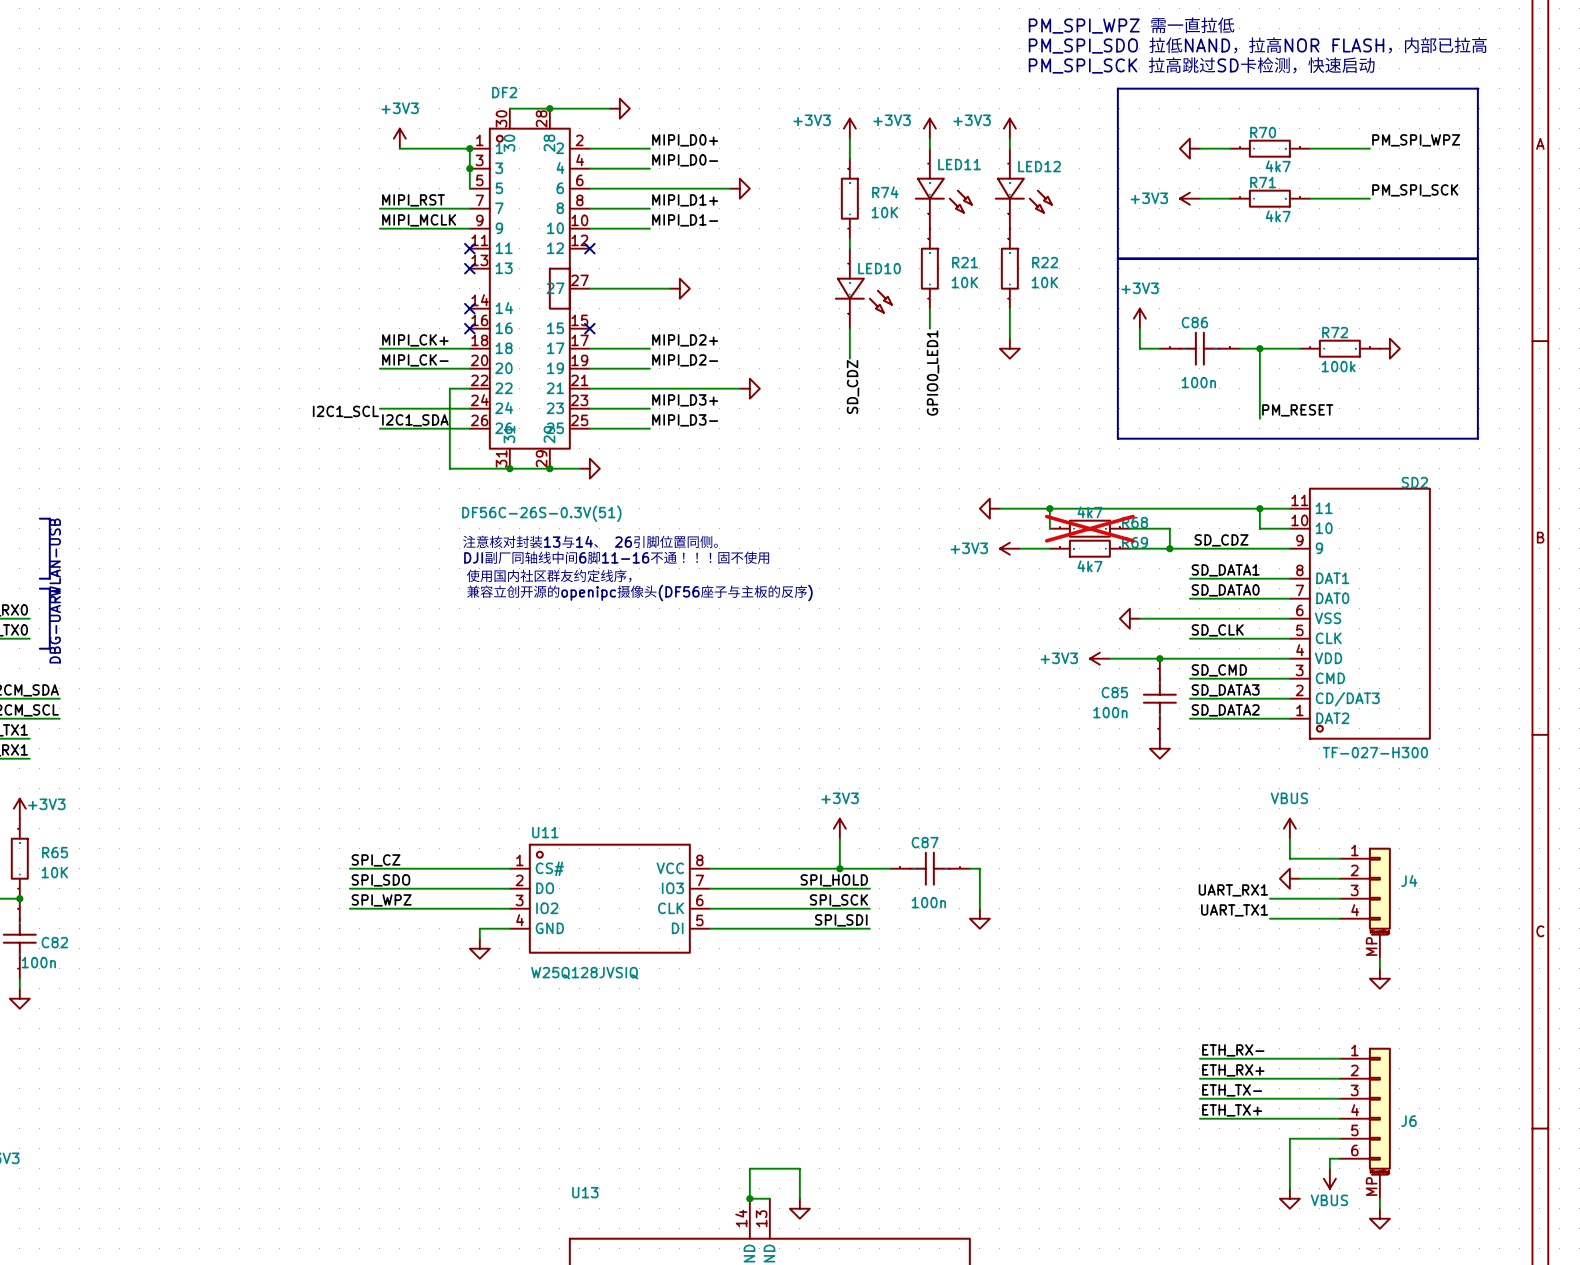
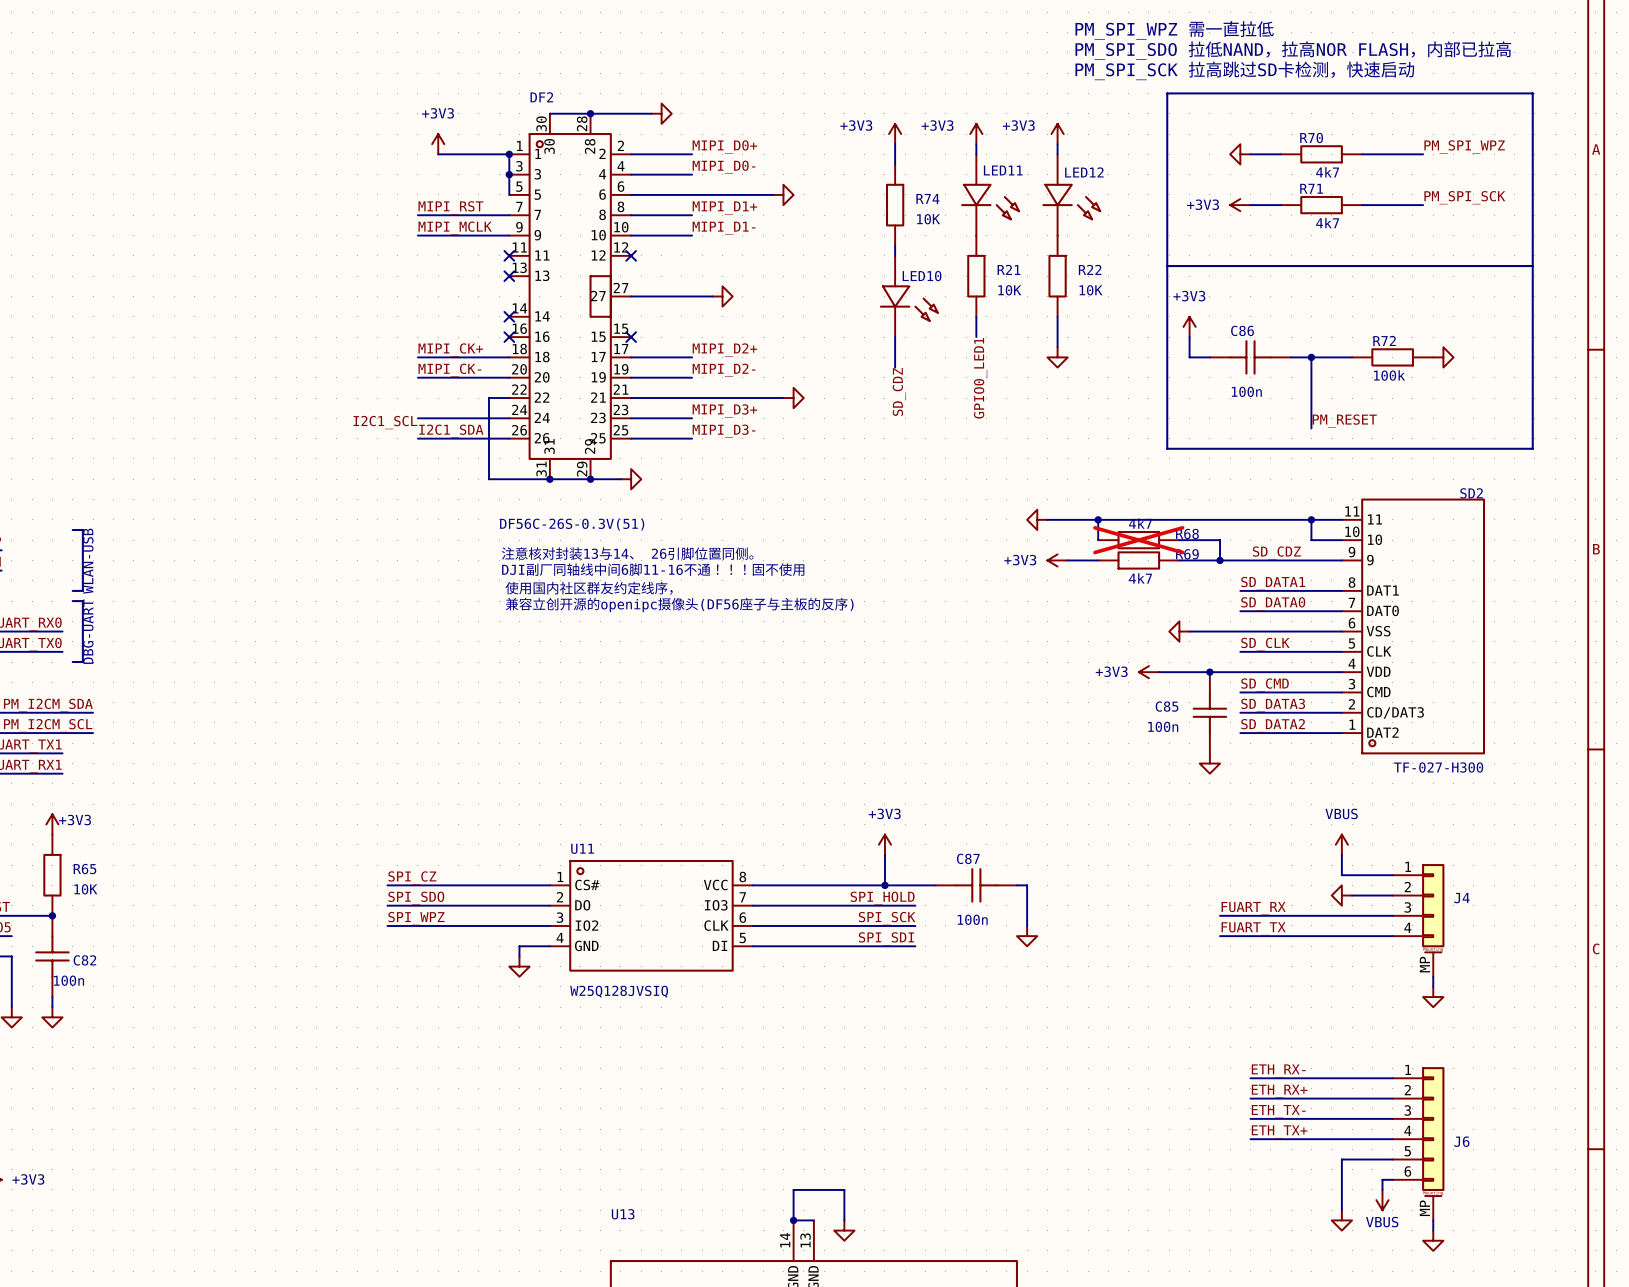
label: none -> FUART_RX (1253, 908)
label: UART_RX1 (1233, 890) -> none
wire: none -> (1220, 915) (1321, 915)
label: none -> FUART_TX (1253, 928)
label: UART_TX1 (1234, 910) -> none
wire: none -> (1220, 936) (1321, 936)

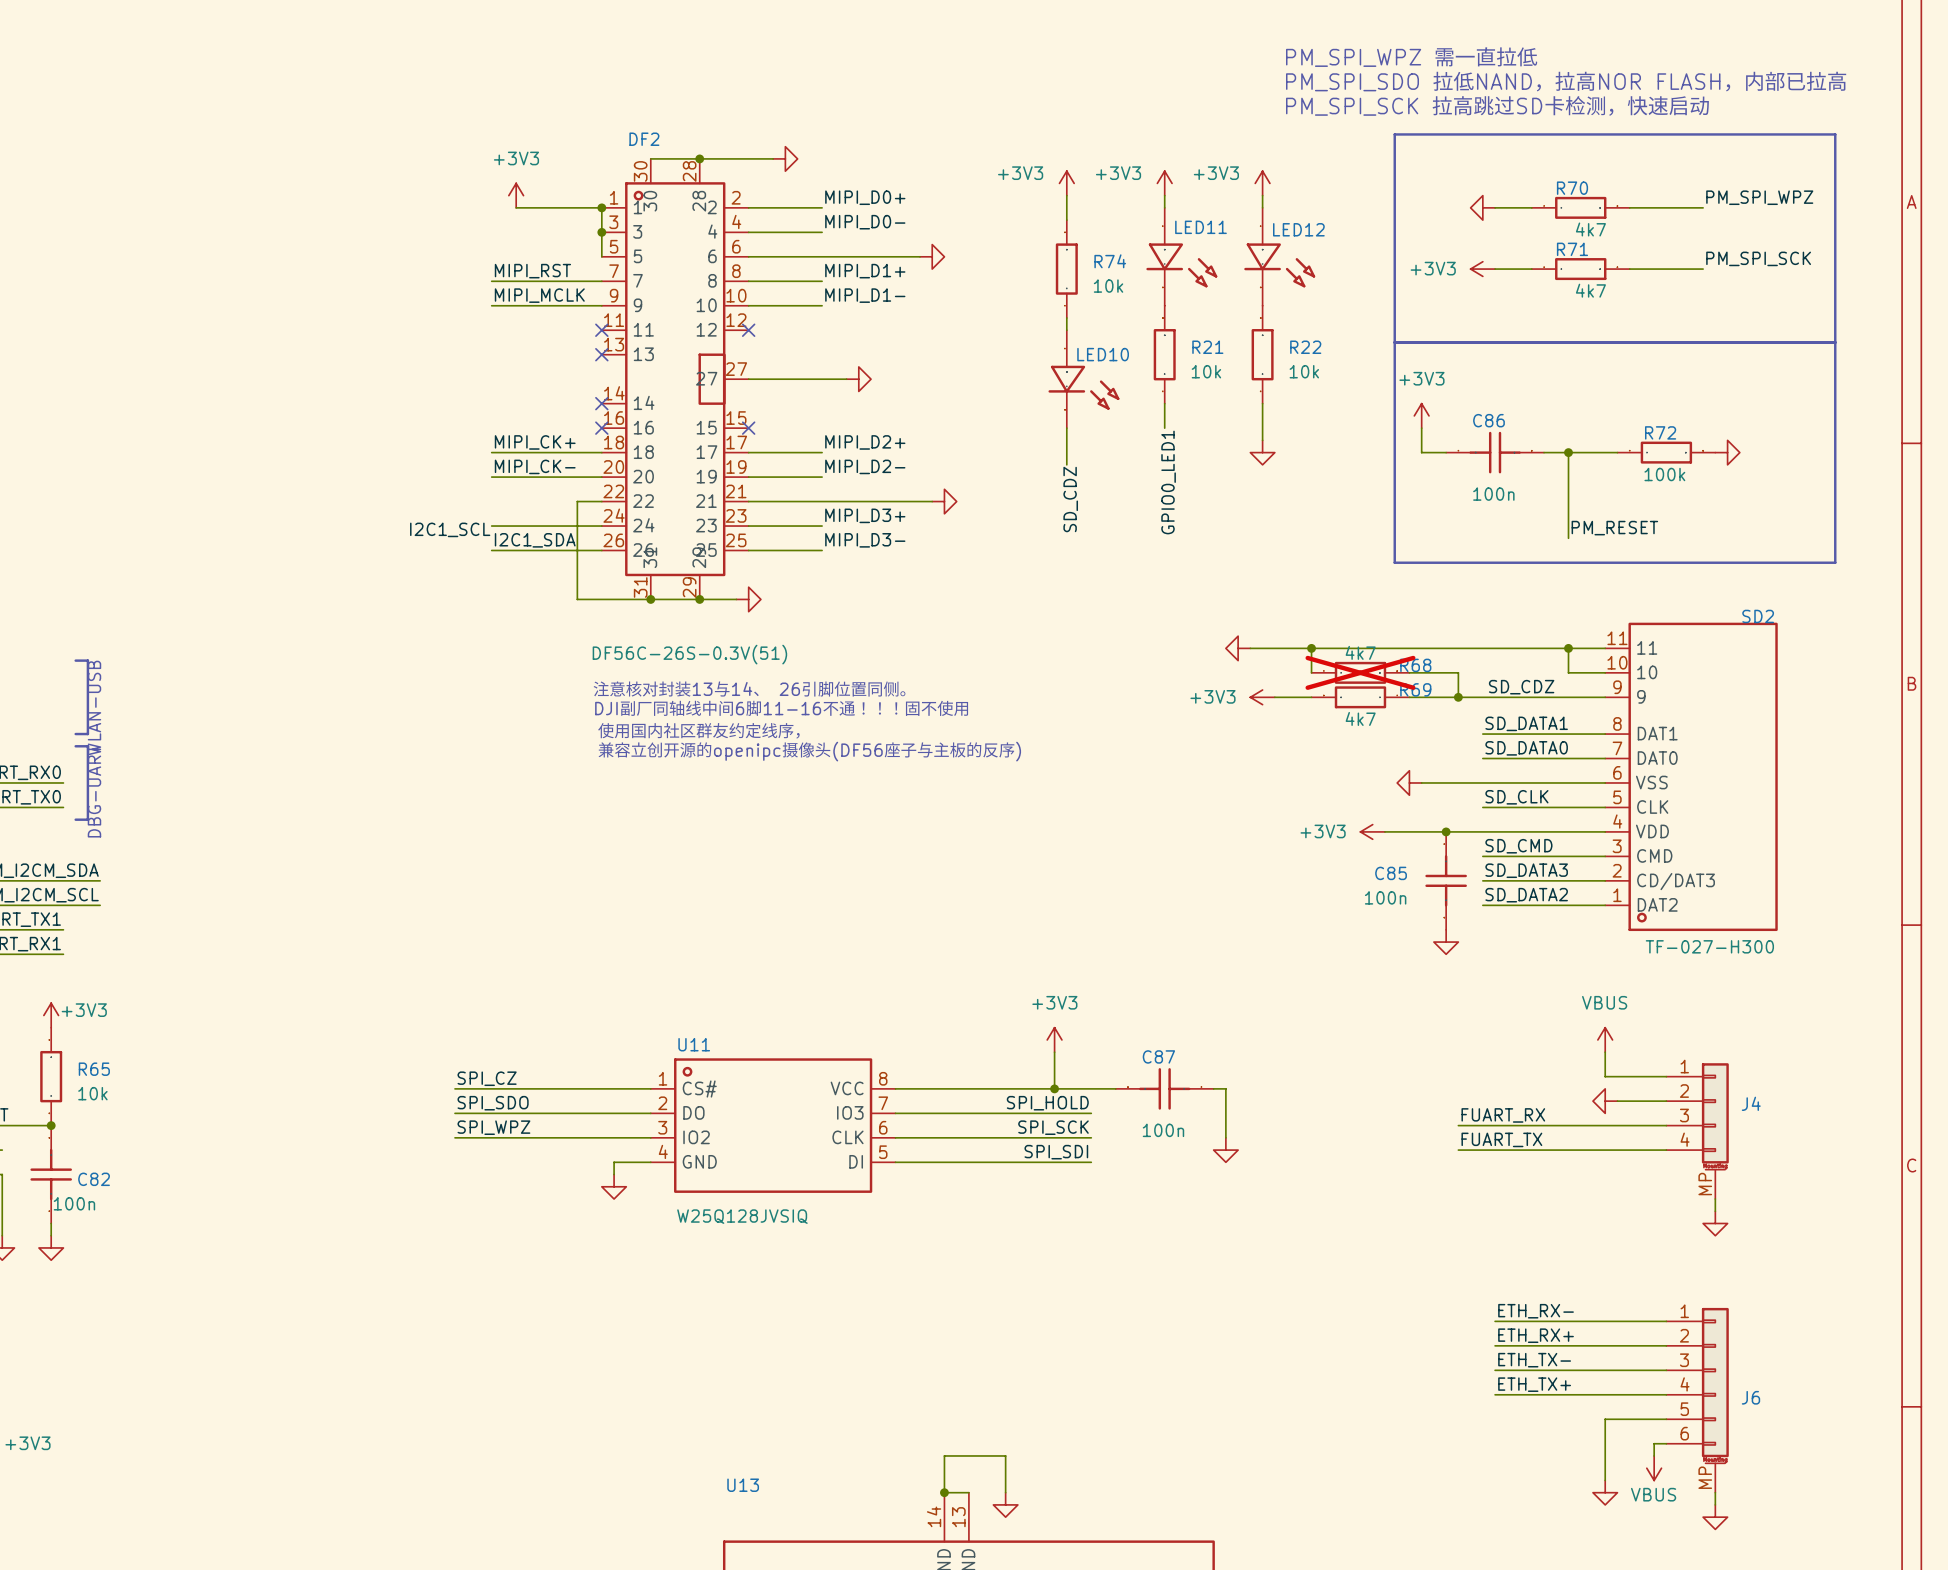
R74 value: 10K (928, 219) -> 10k (1108, 286)
R21 value: 10K (1009, 290) -> 10k (1206, 371)
R22 value: 10K (1091, 290) -> 10k (1304, 371)
R65 value: 10K (85, 889) -> 10k (92, 1093)

